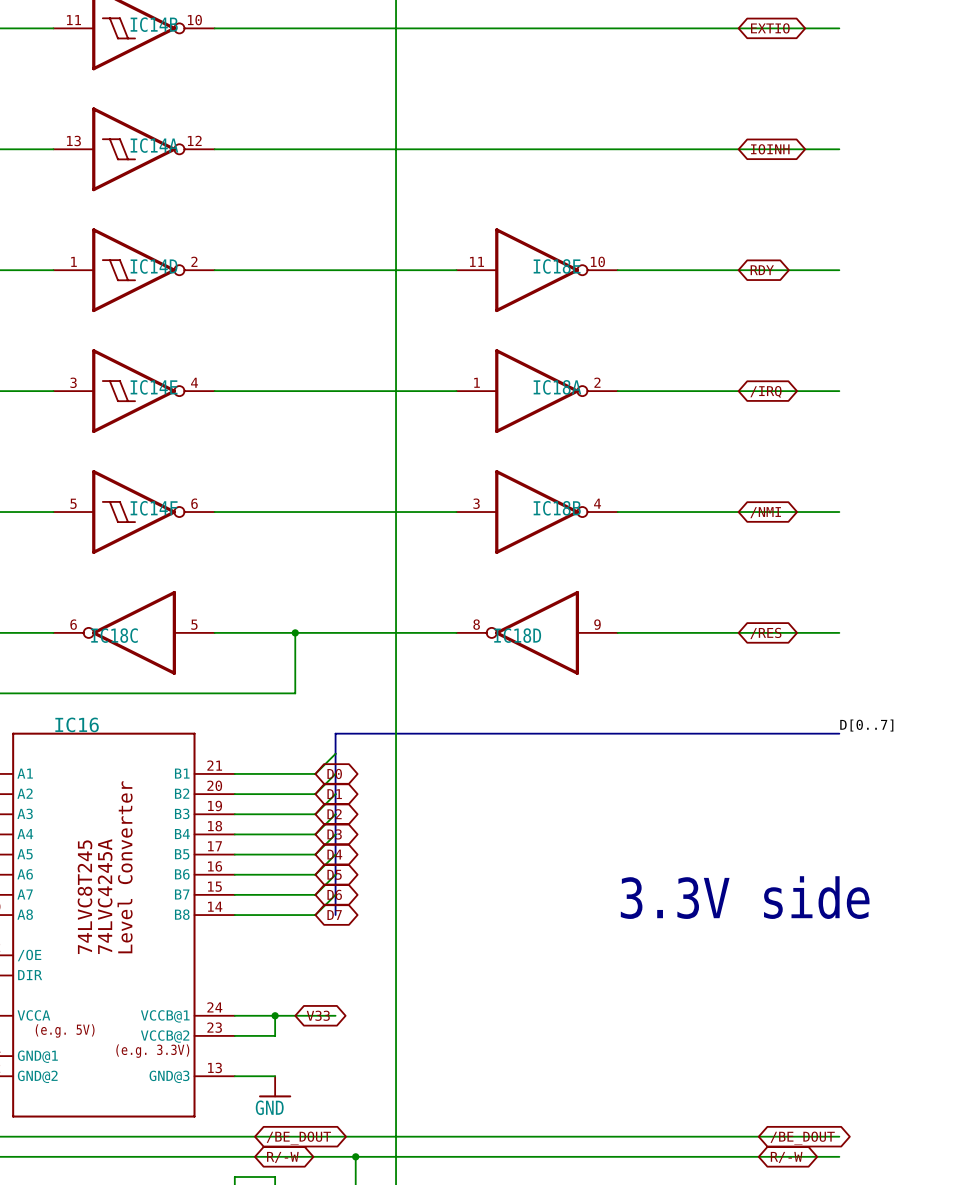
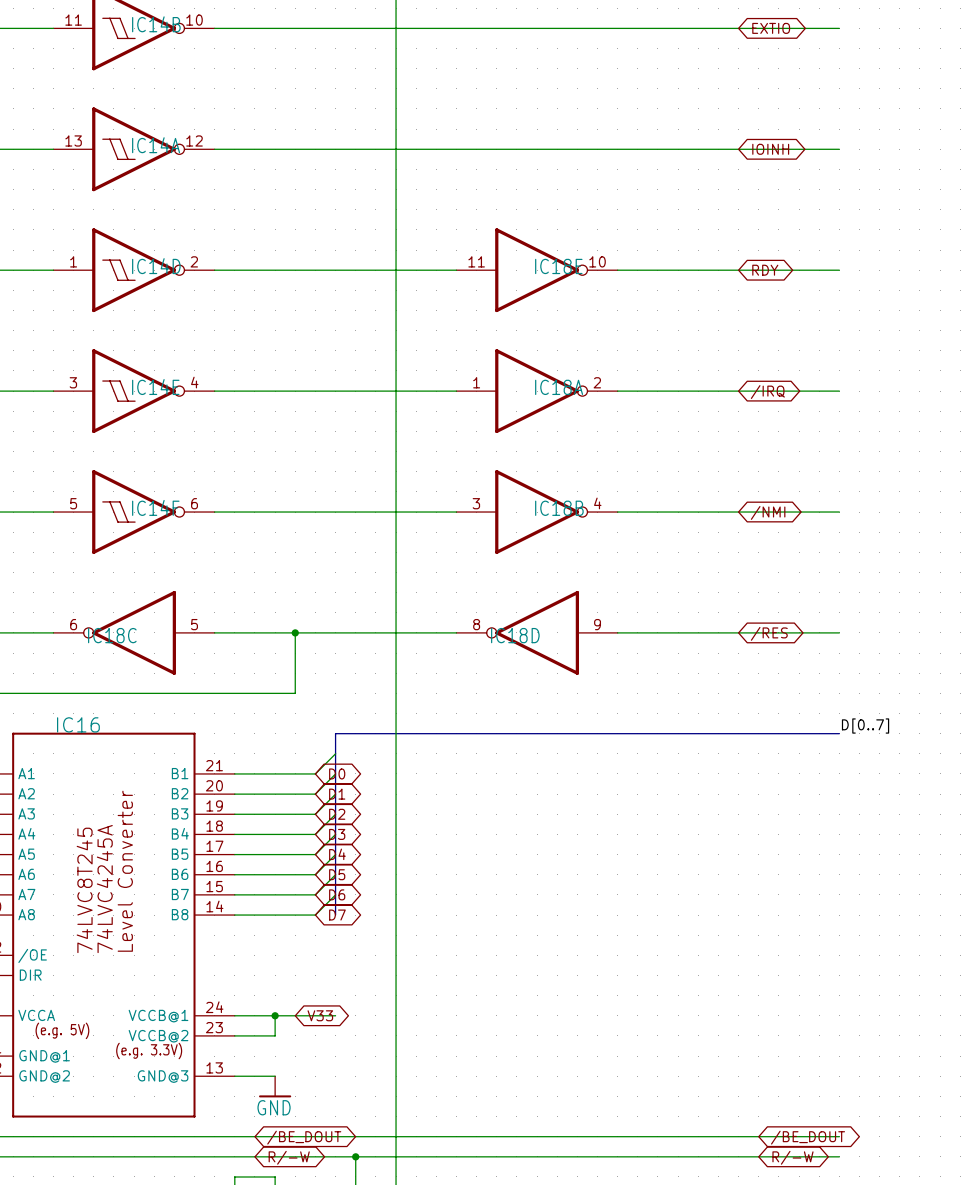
text: 3.3V side (745, 897) -> none

